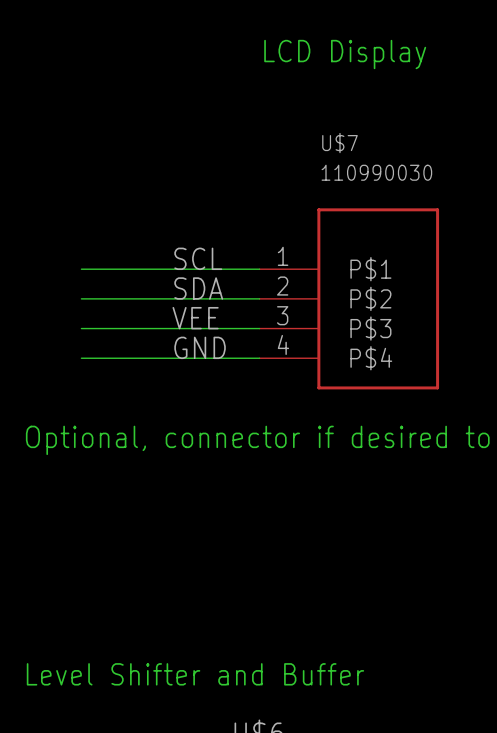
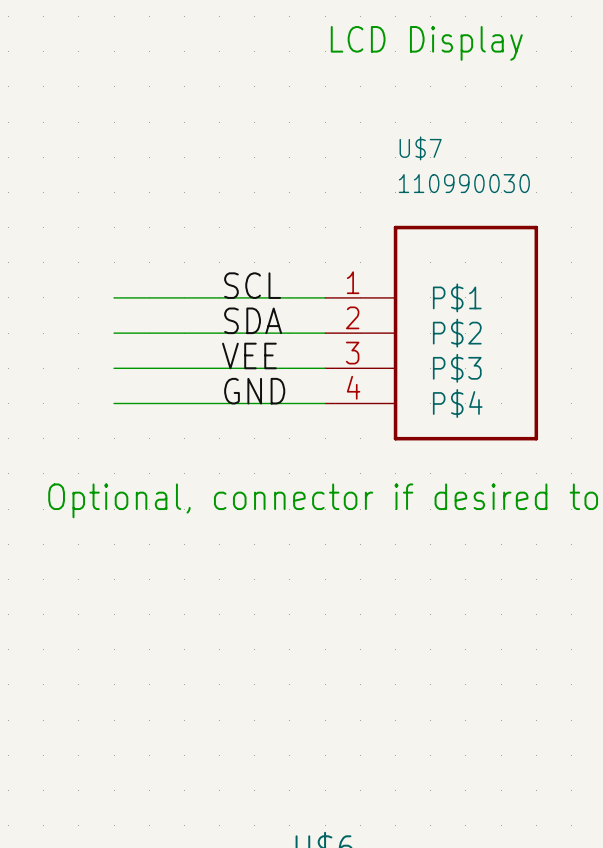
text: Level Shifter and Buffer (195, 674) -> none

